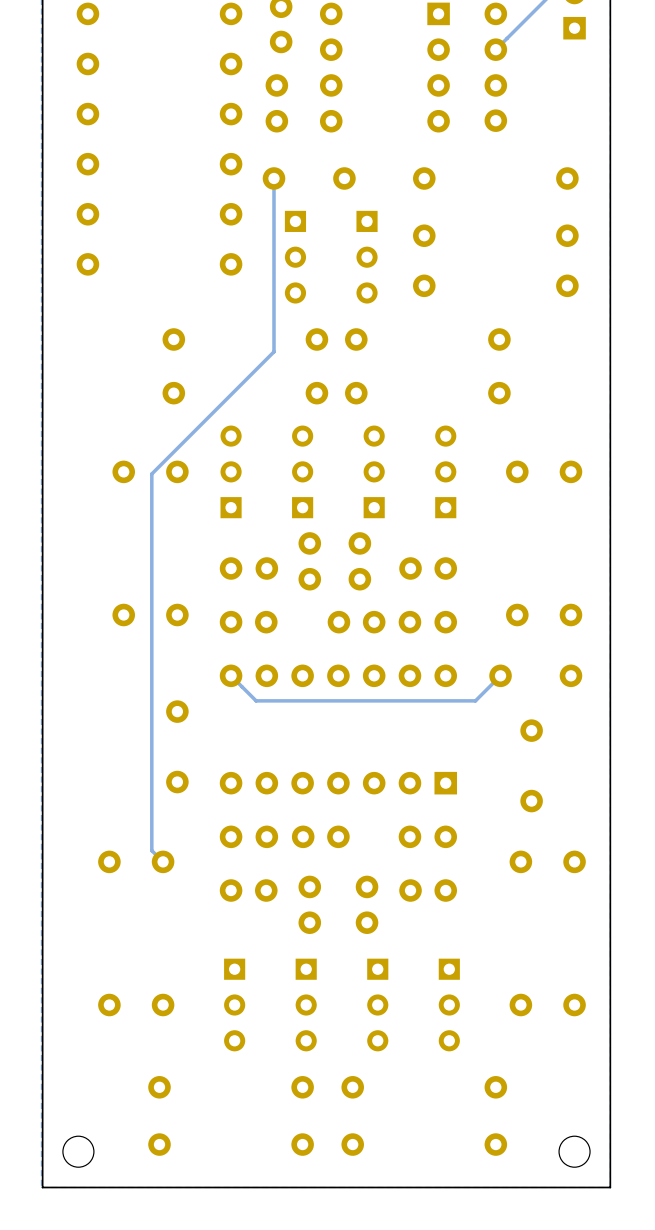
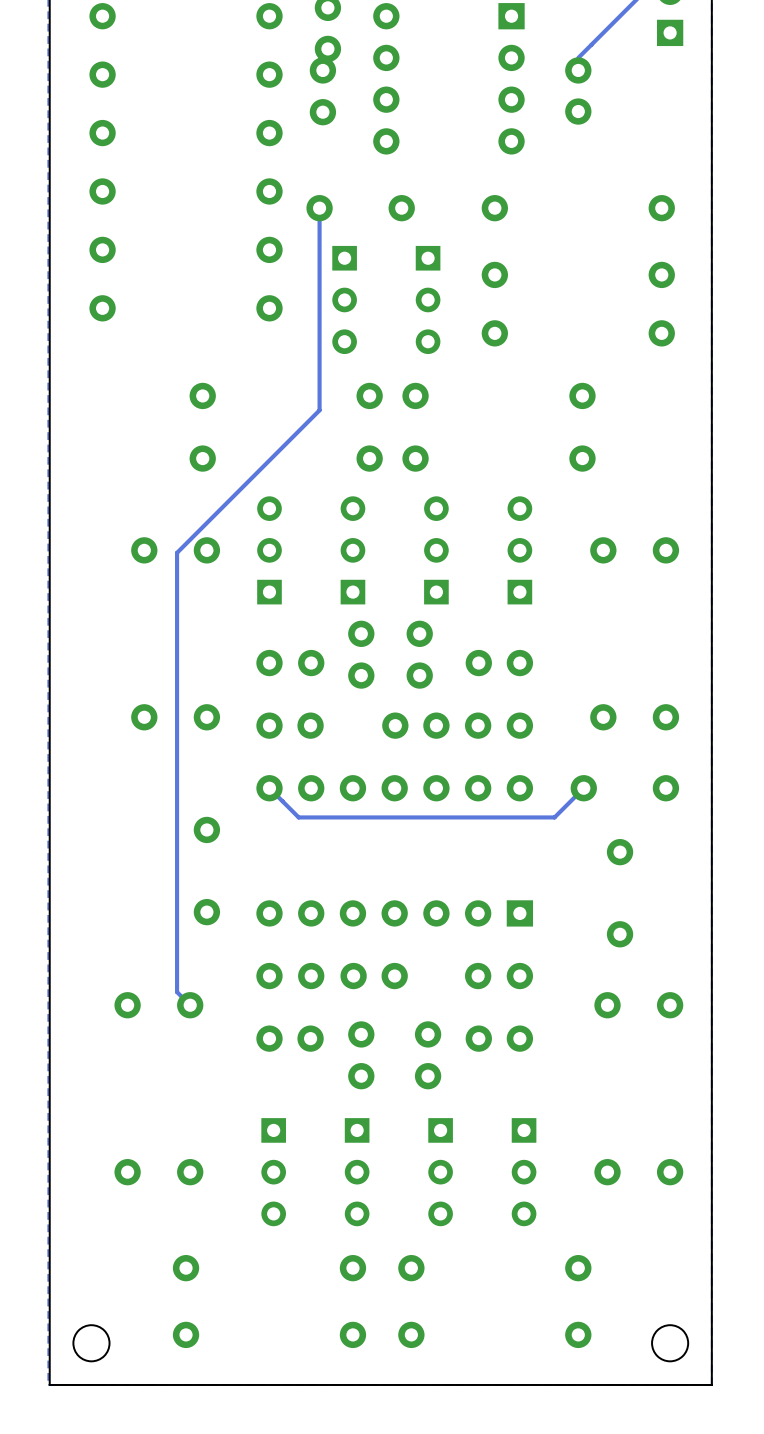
part: (495, 31) -> none
part: none -> (578, 90)
part position: (276, 103) -> (322, 91)
part: (495, 103) -> none

